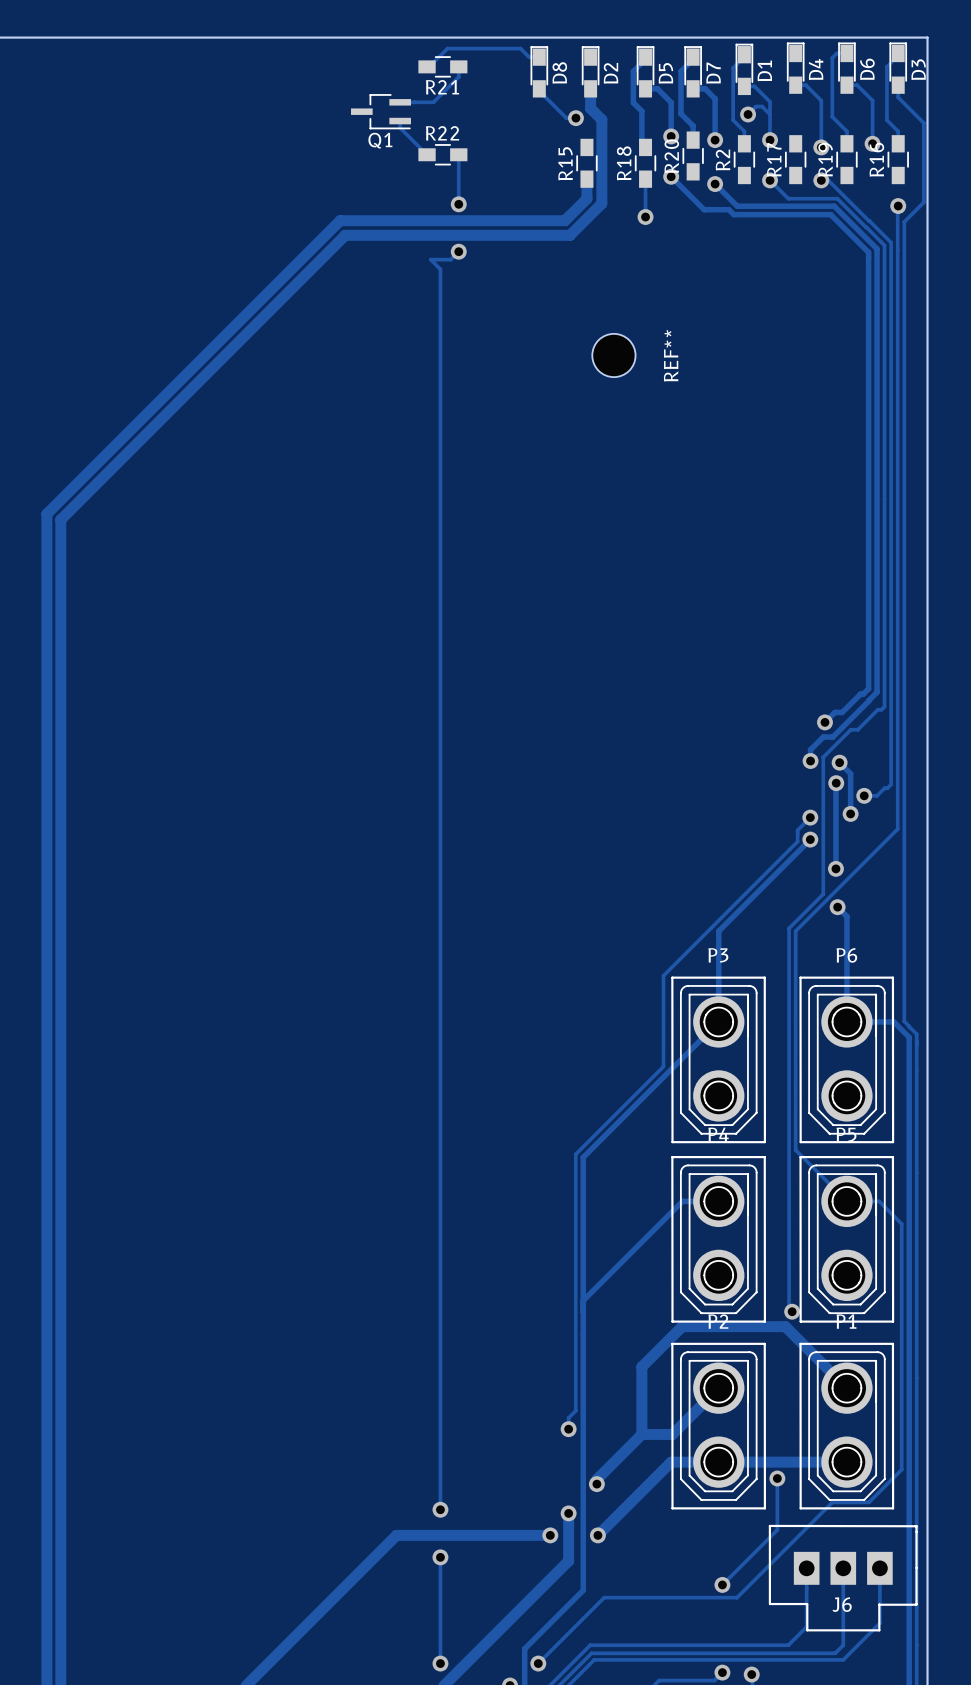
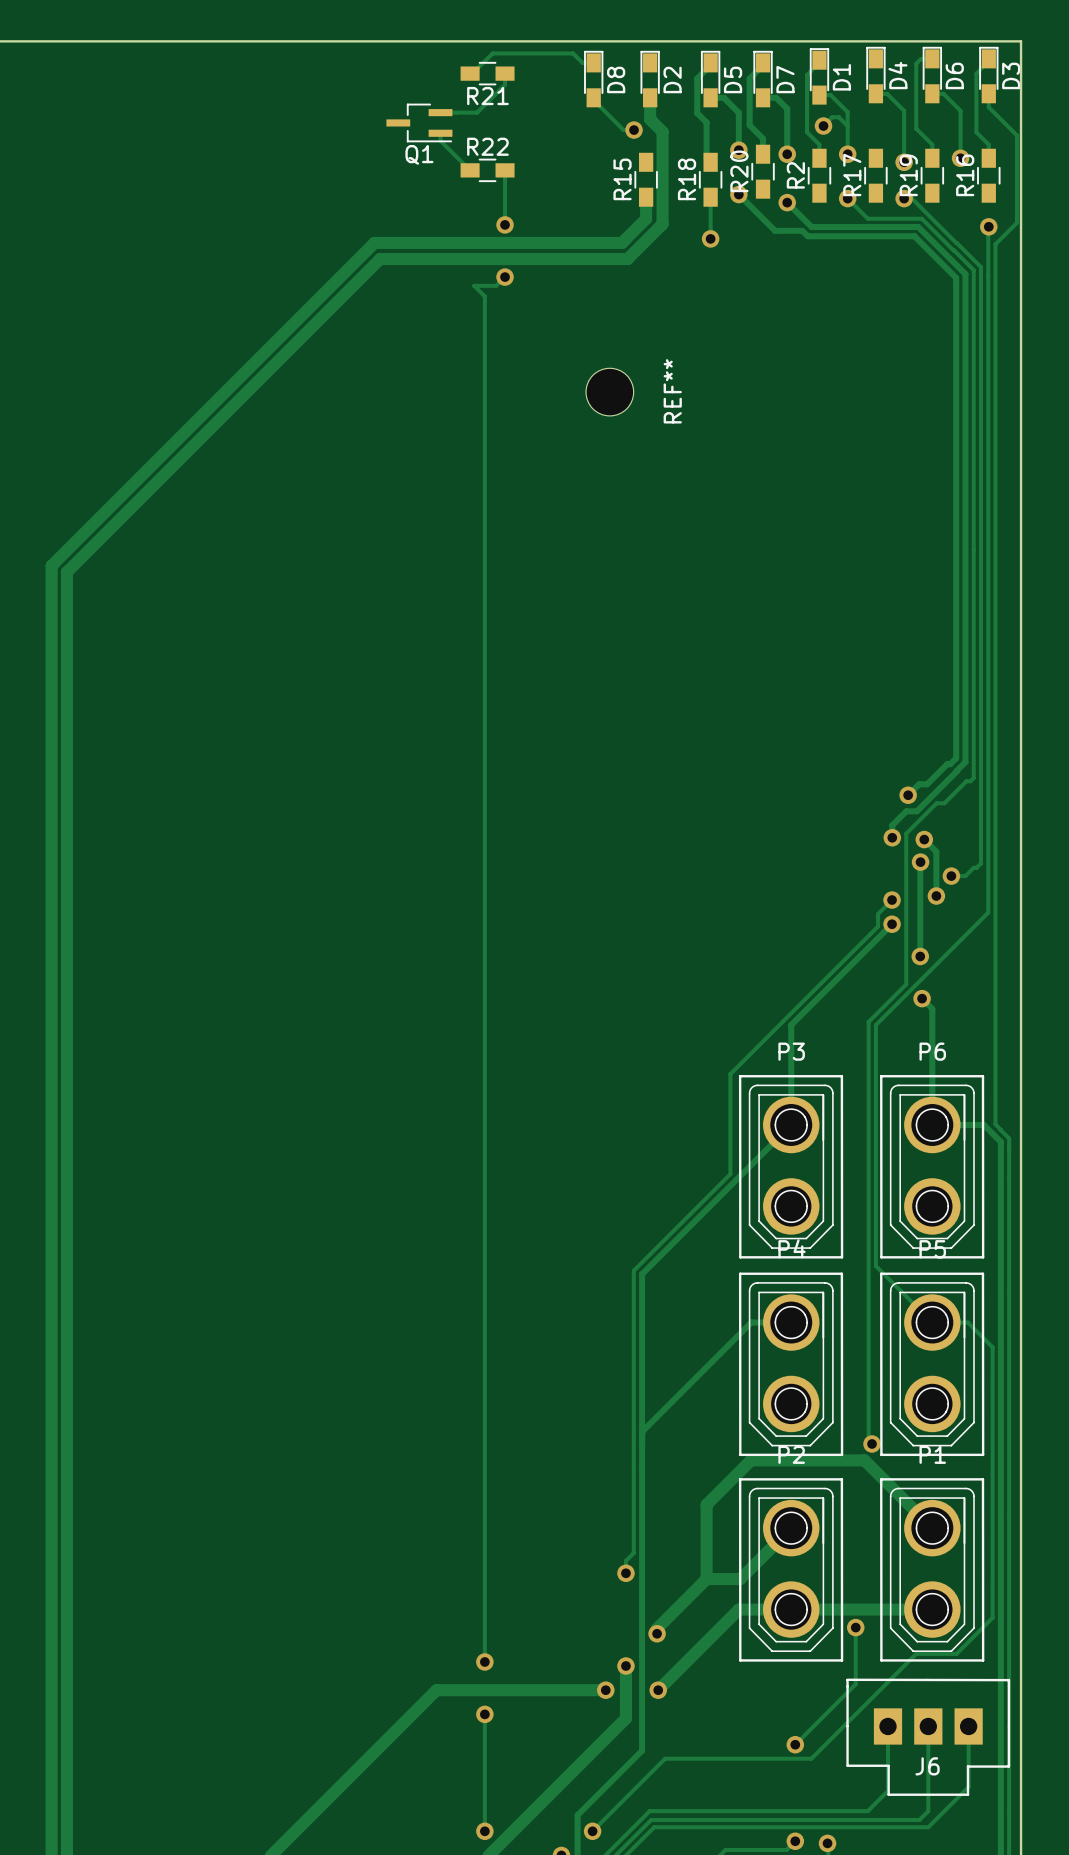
REF** position: (613, 355) -> (609, 392)

